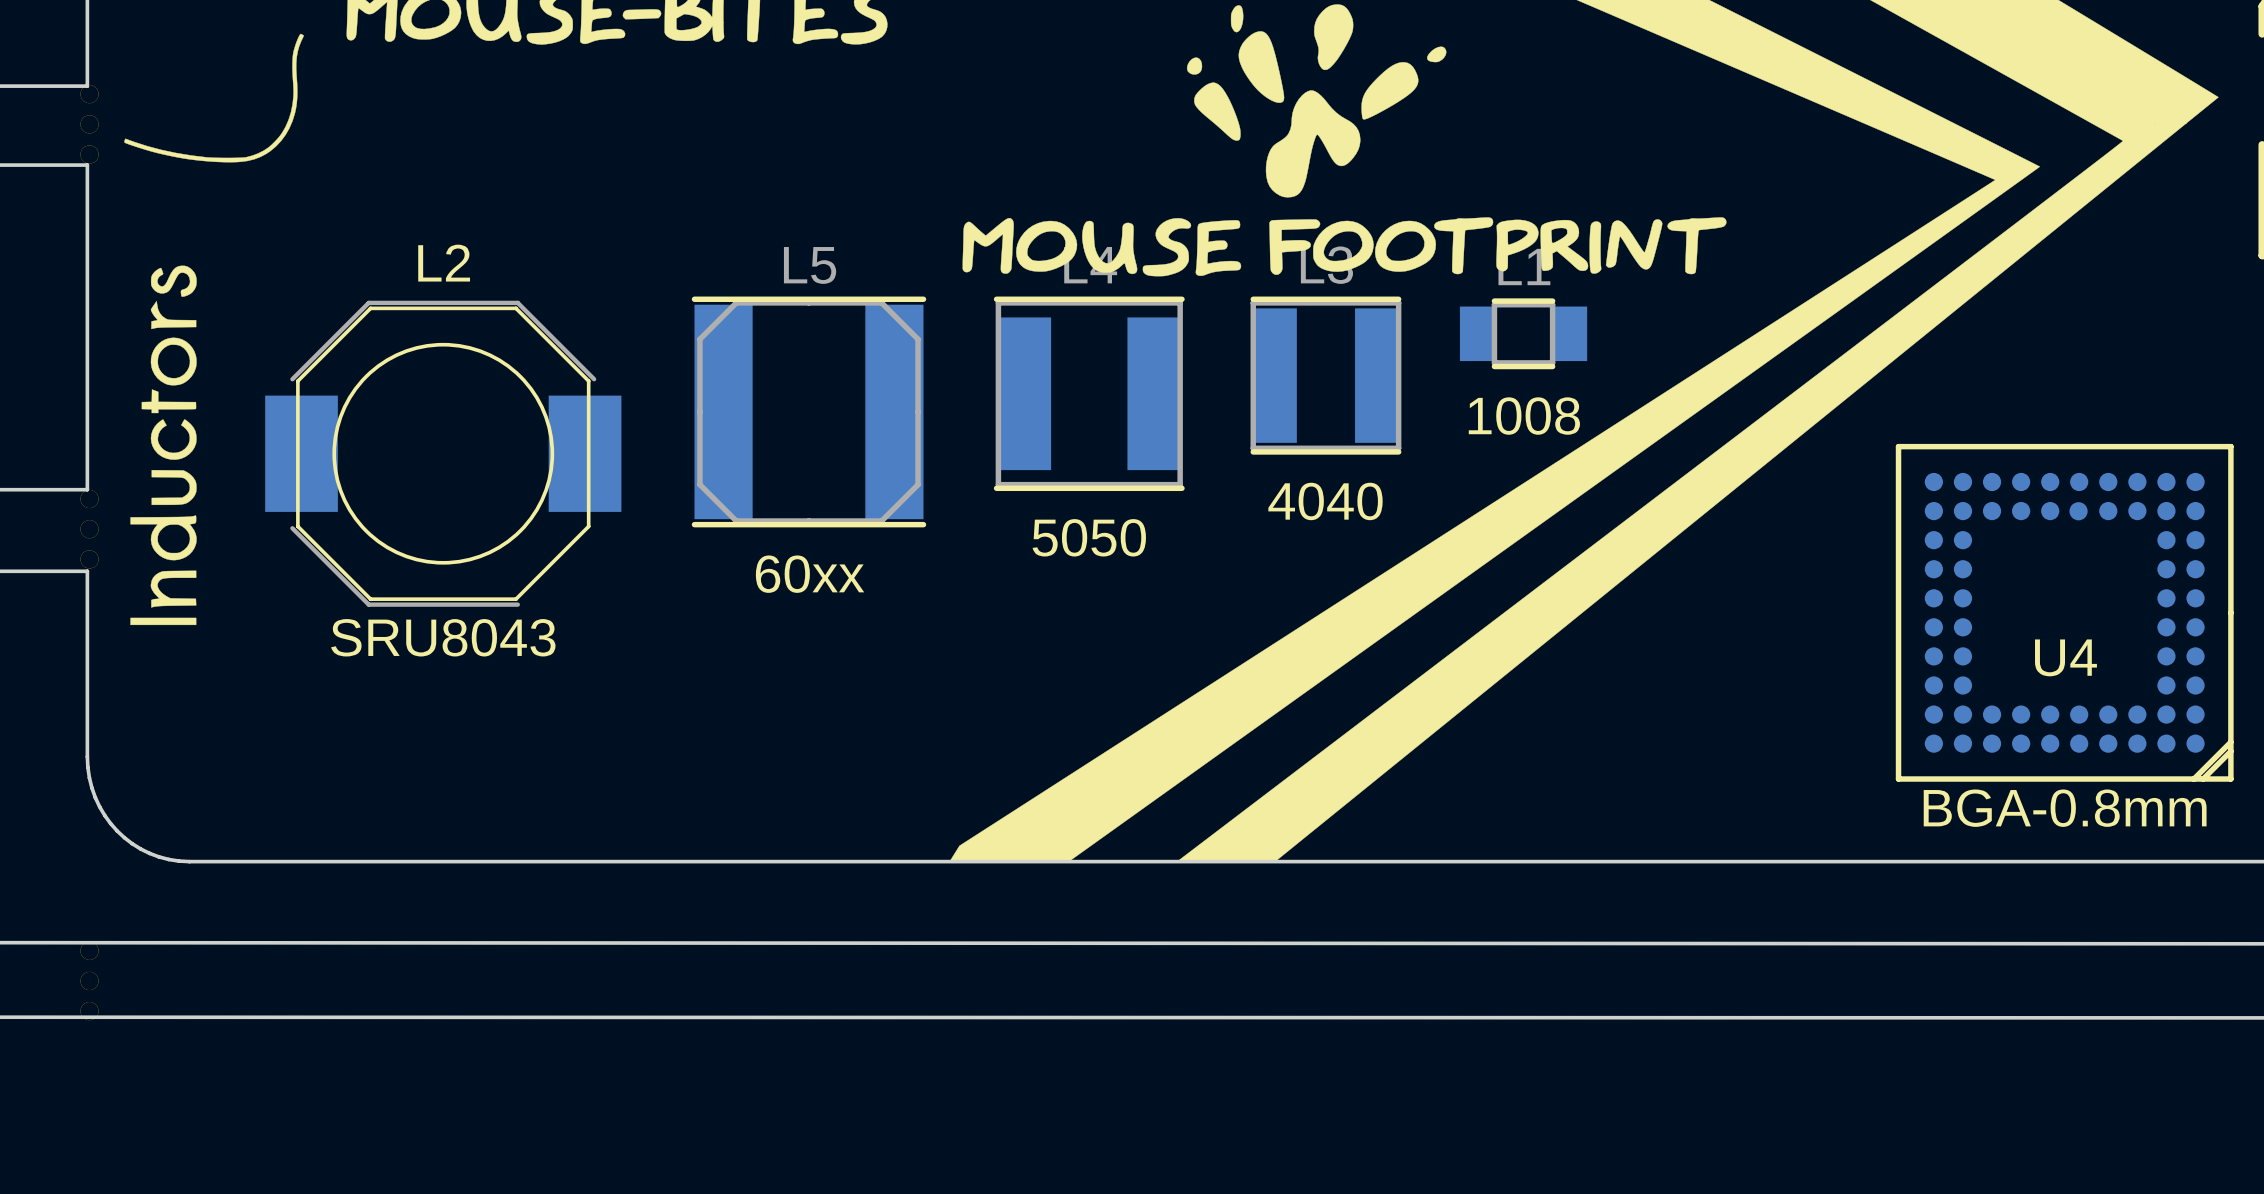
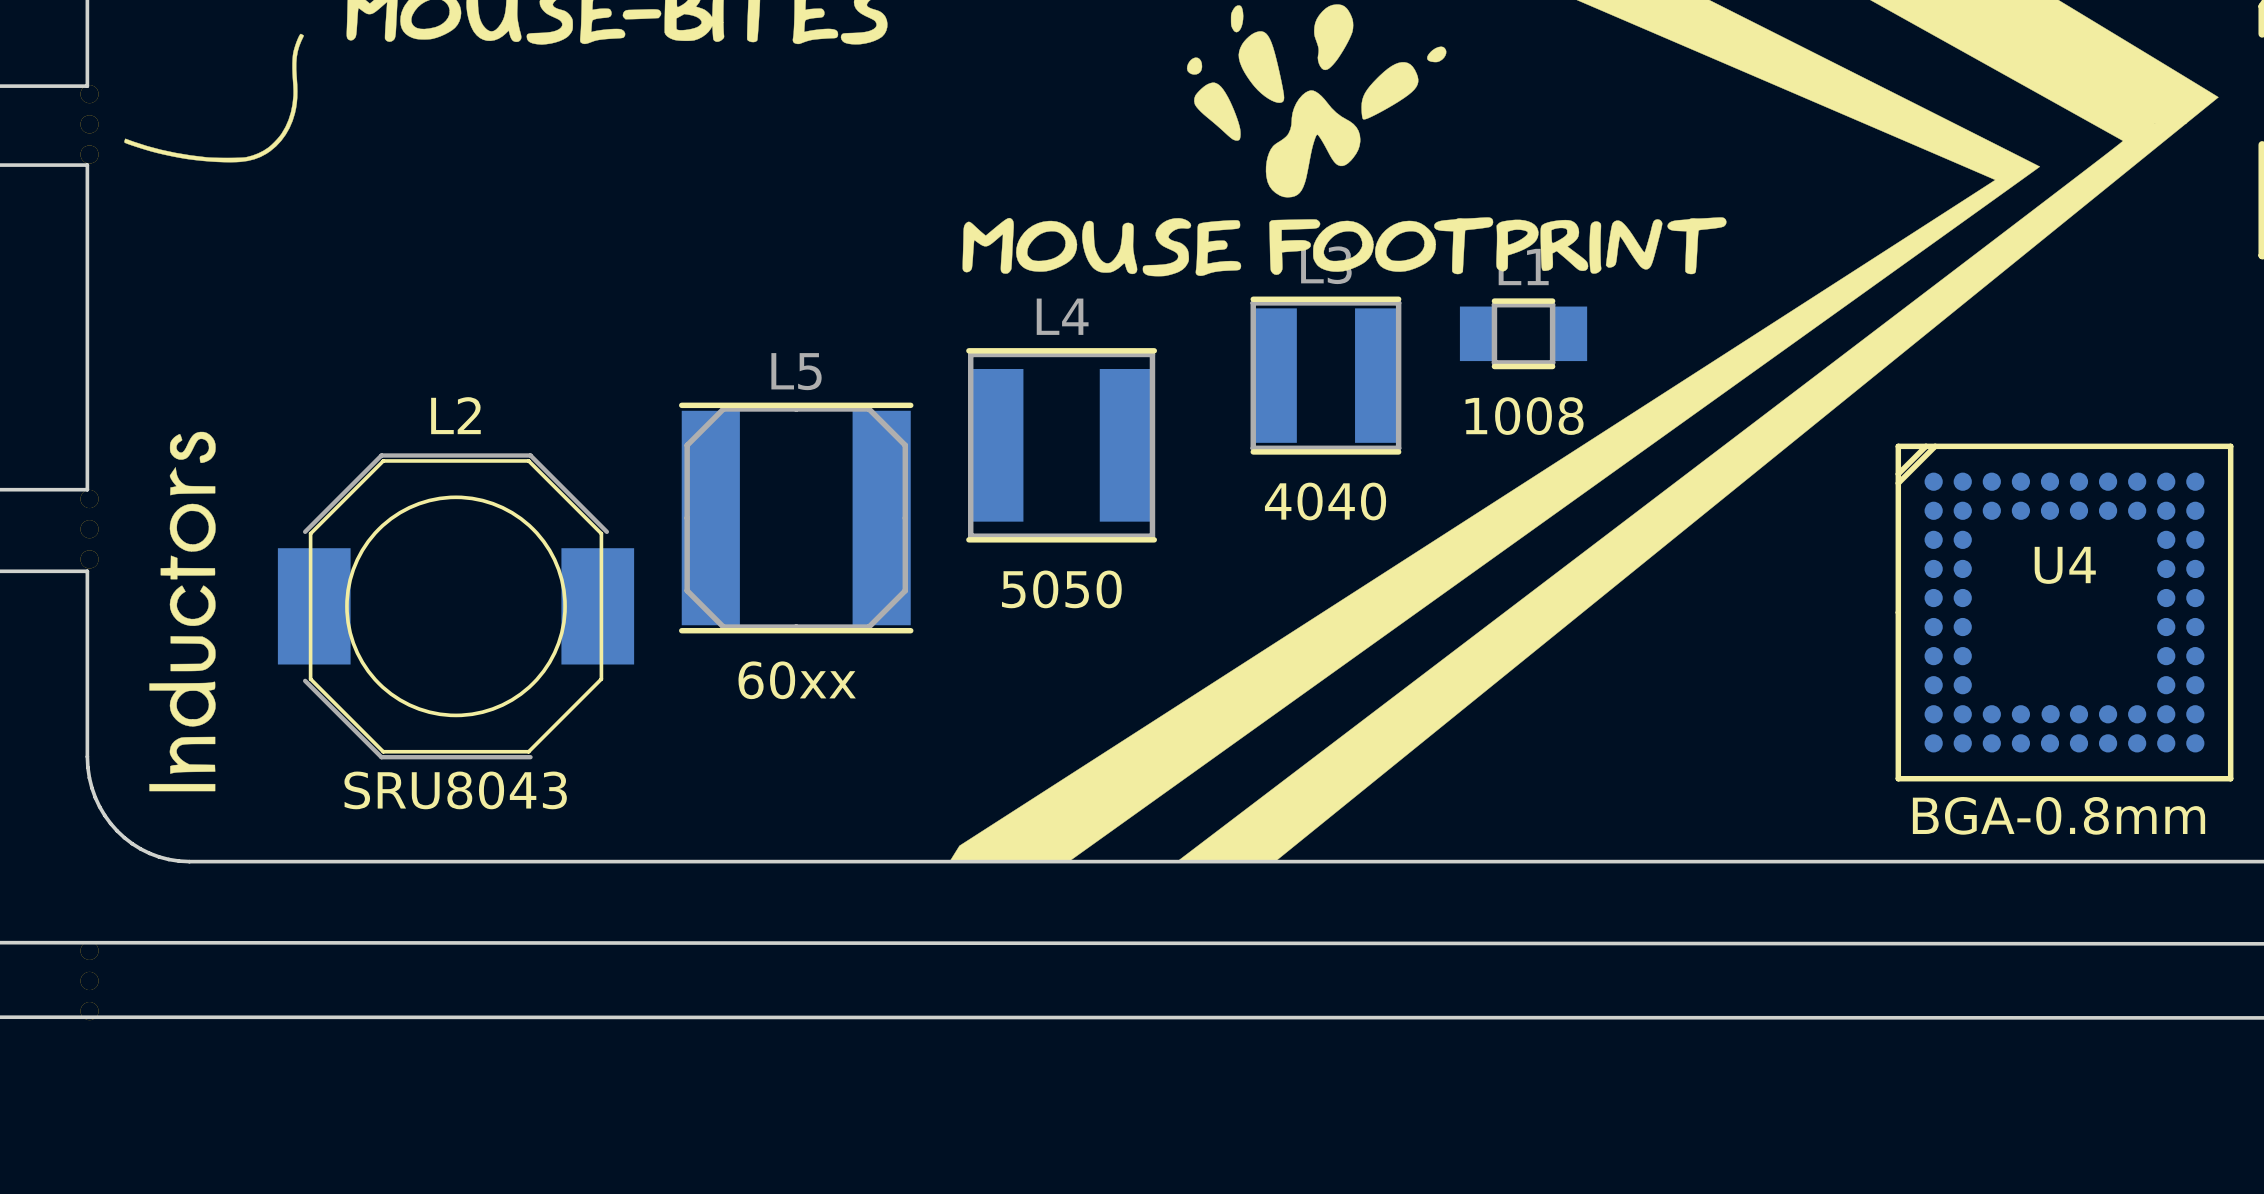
L4 position: (1089, 393) -> (1061, 445)
L5 position: (808, 411) -> (796, 518)
drawing position: (163, 445) -> (182, 611)
L2 position: (443, 453) -> (456, 606)
U4 rotation: 0° (2064, 612) -> 180° (2064, 612)

